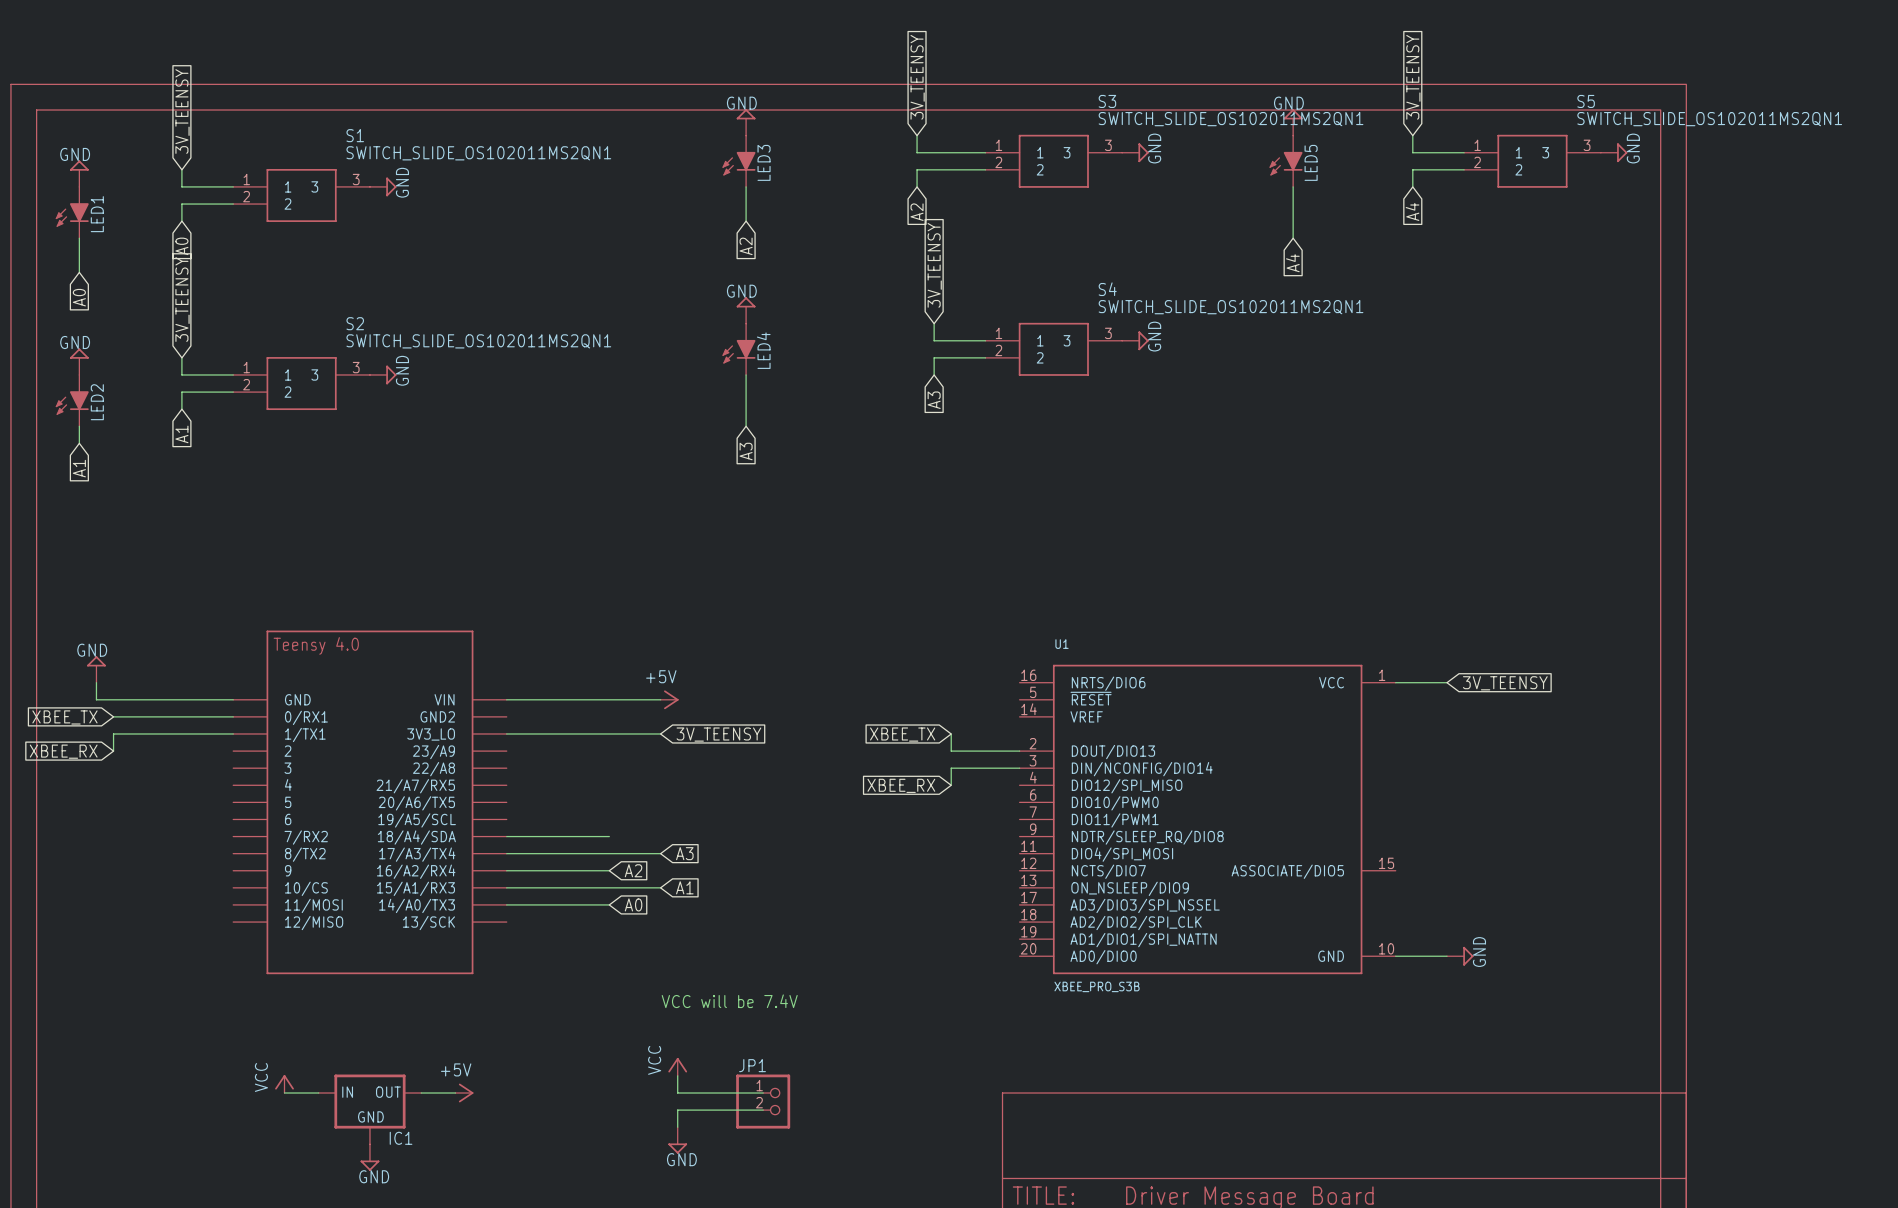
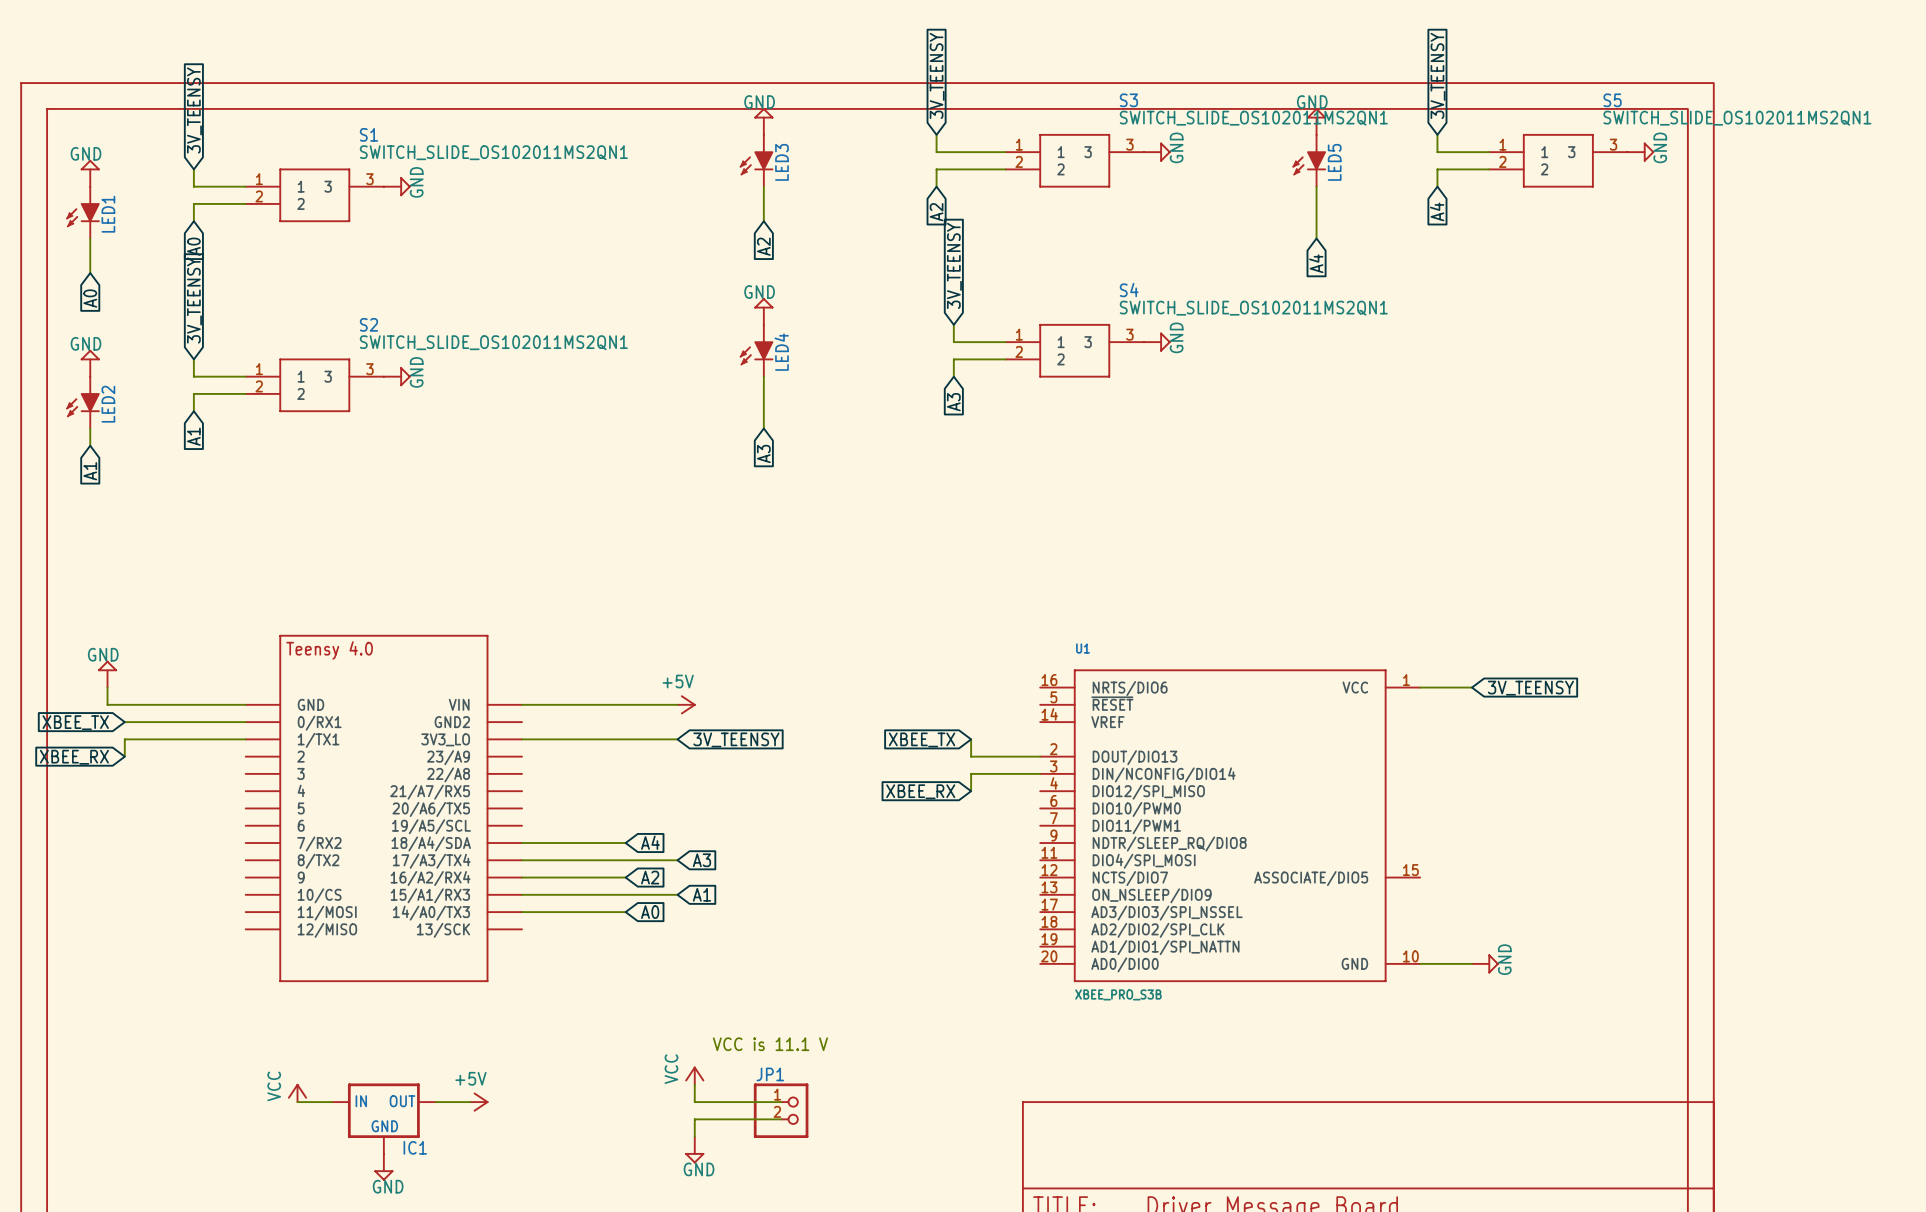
global label: none -> A4 (650, 842)
text: VCC will be 7.4V (729, 1001) -> none
text: none -> VCC is 11.1 V (770, 1044)

